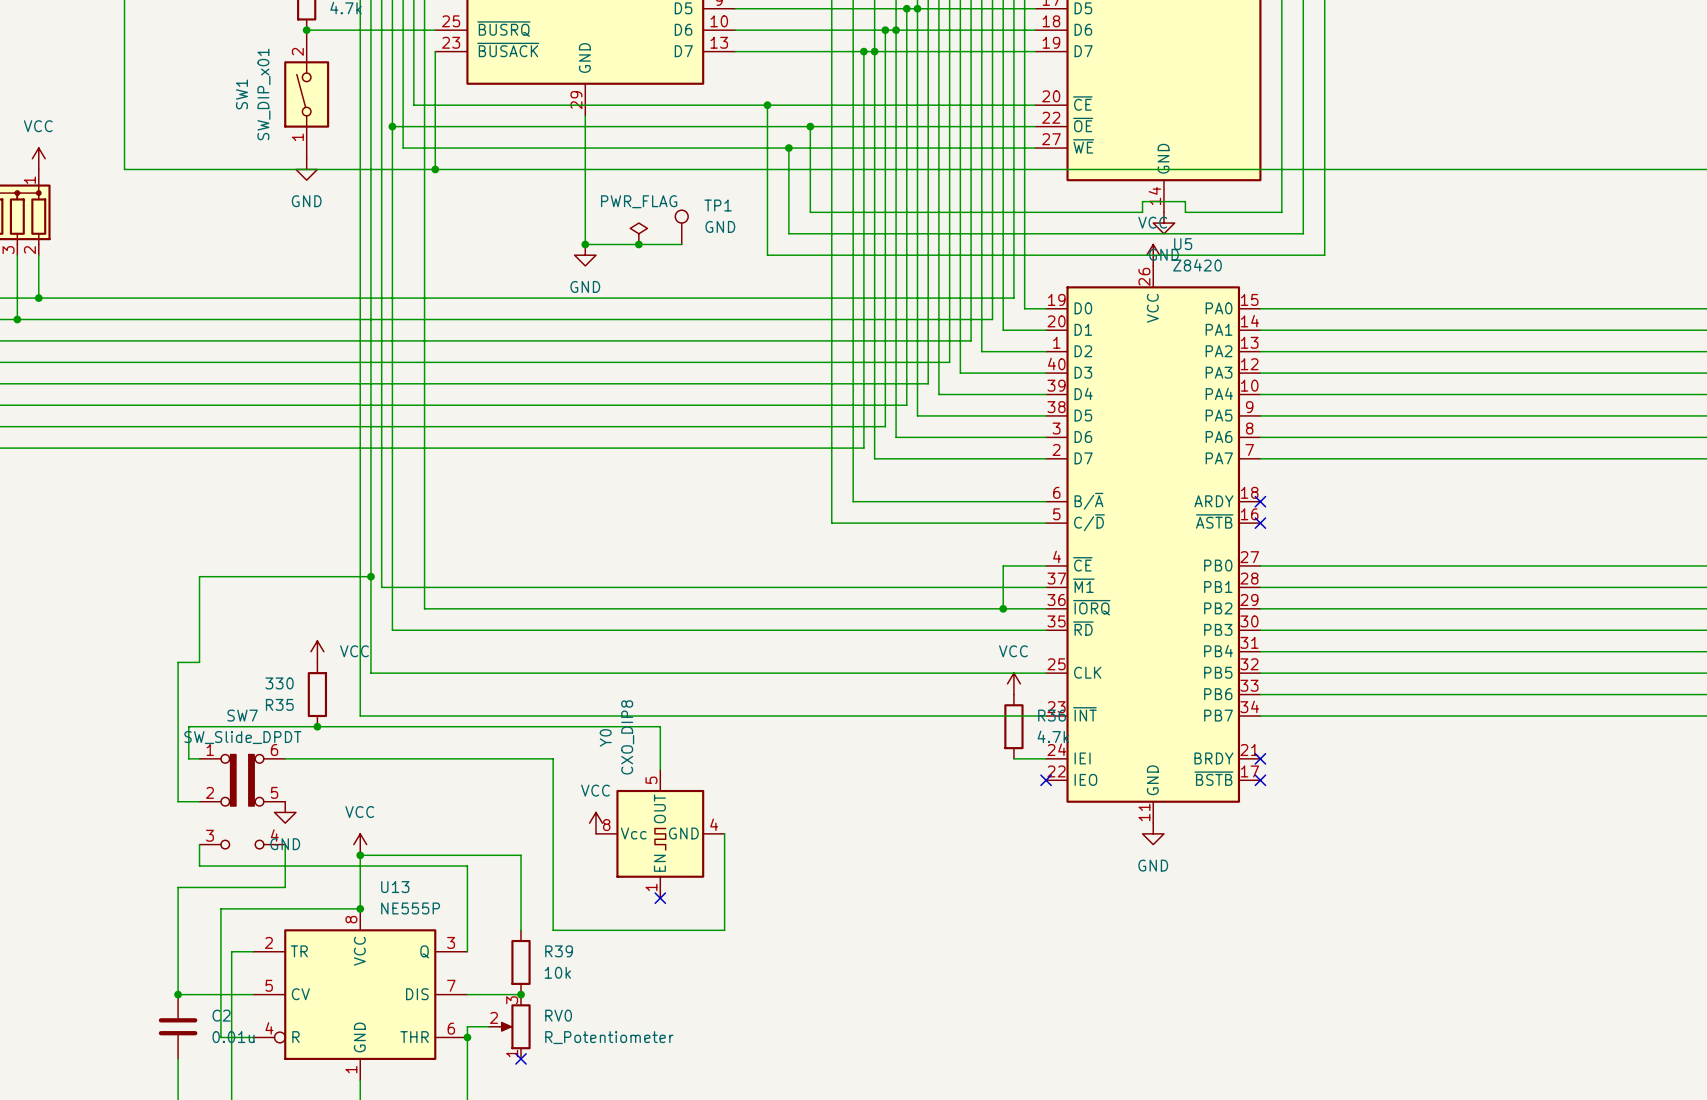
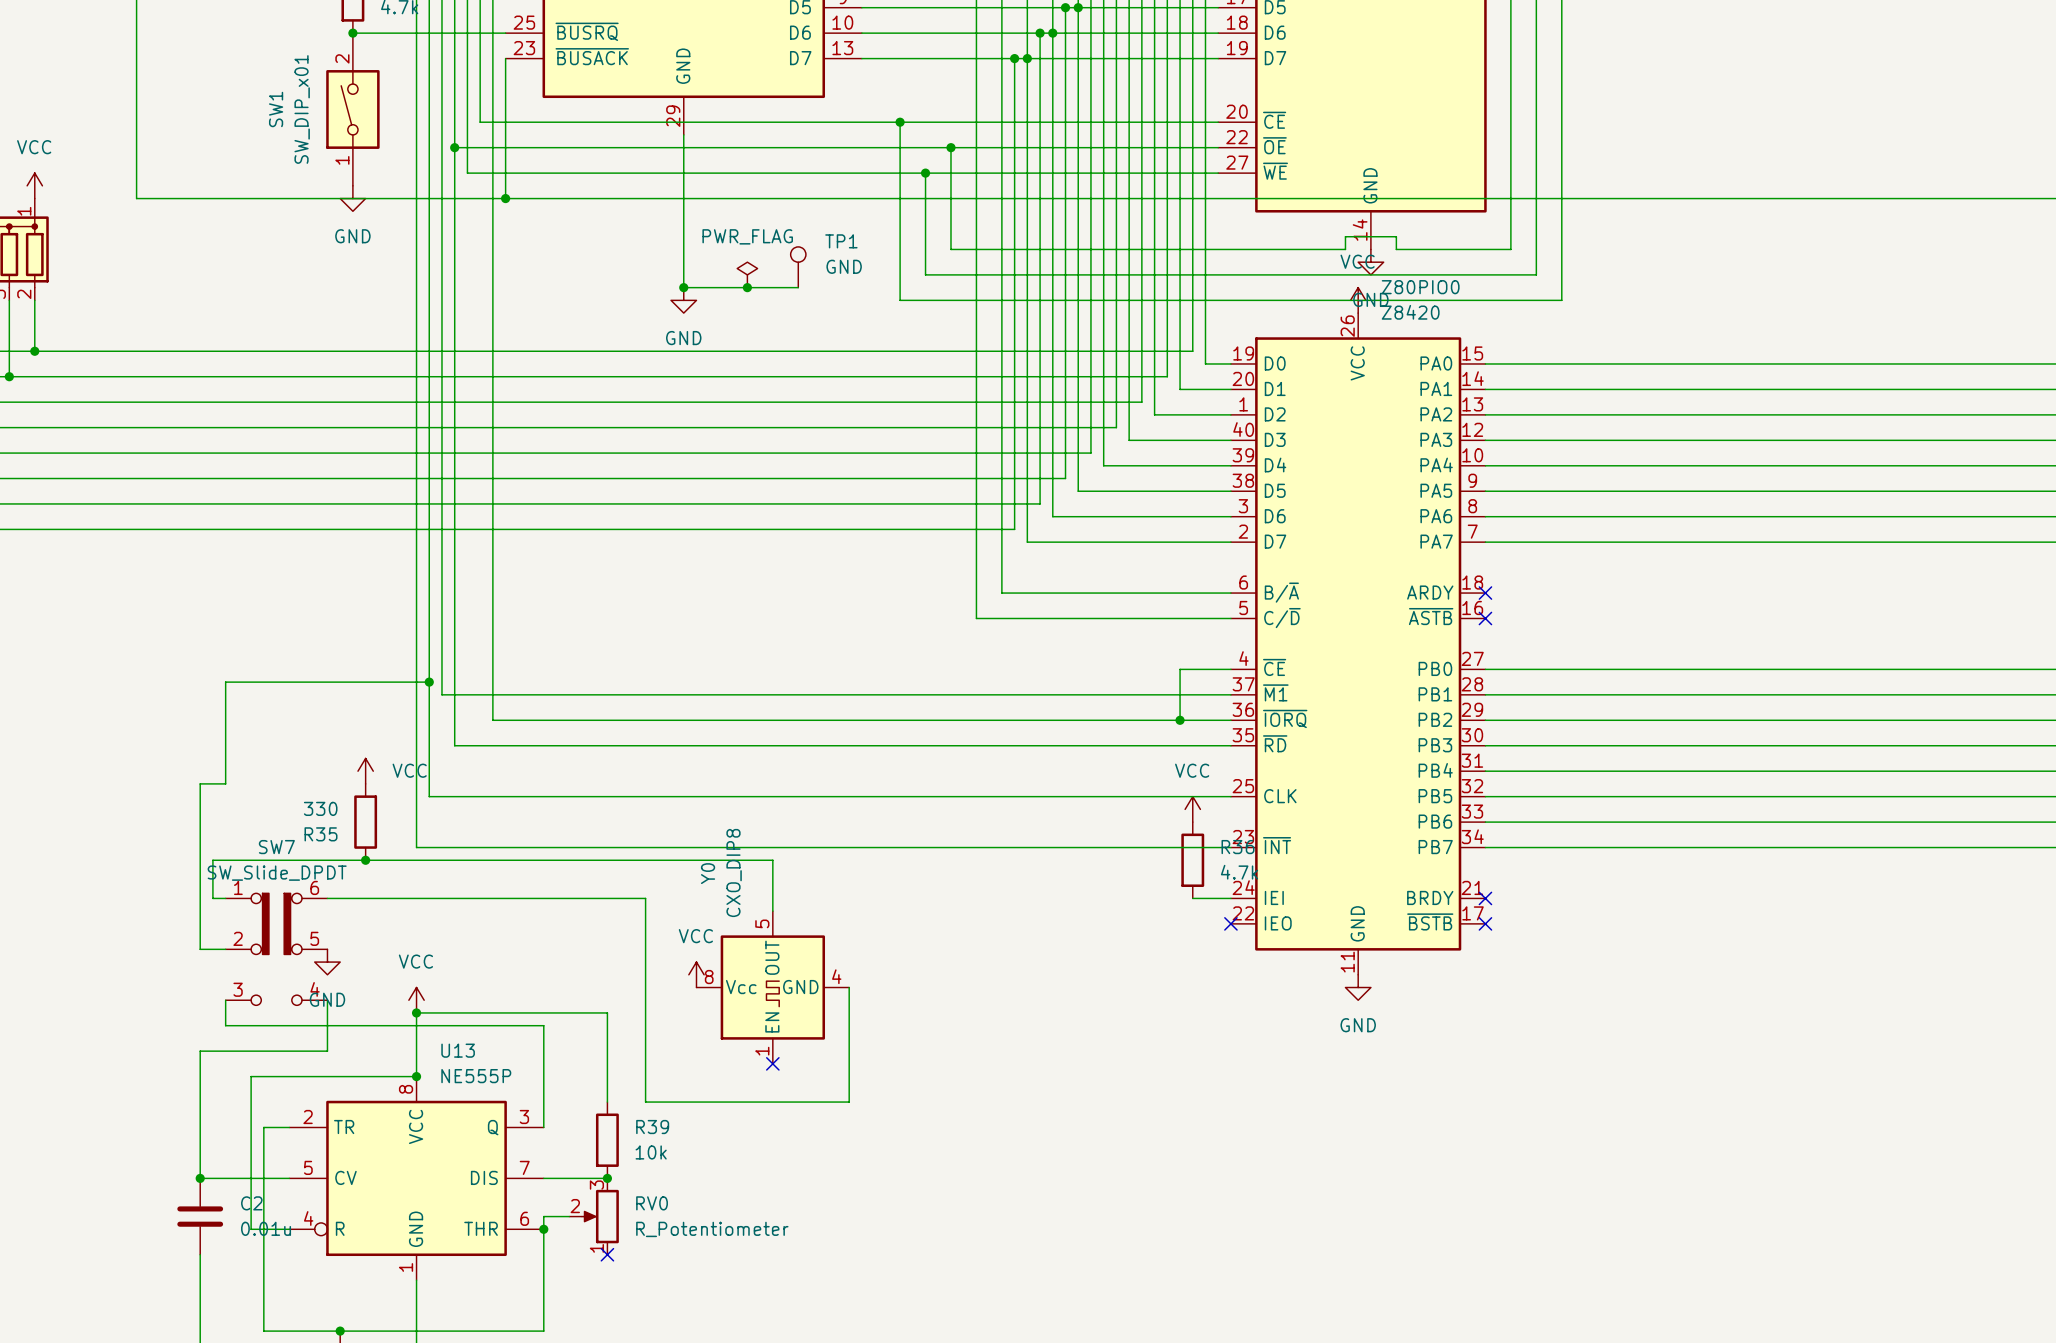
U5 name: U5 (1183, 244) -> Z80PIO0 (1420, 287)

